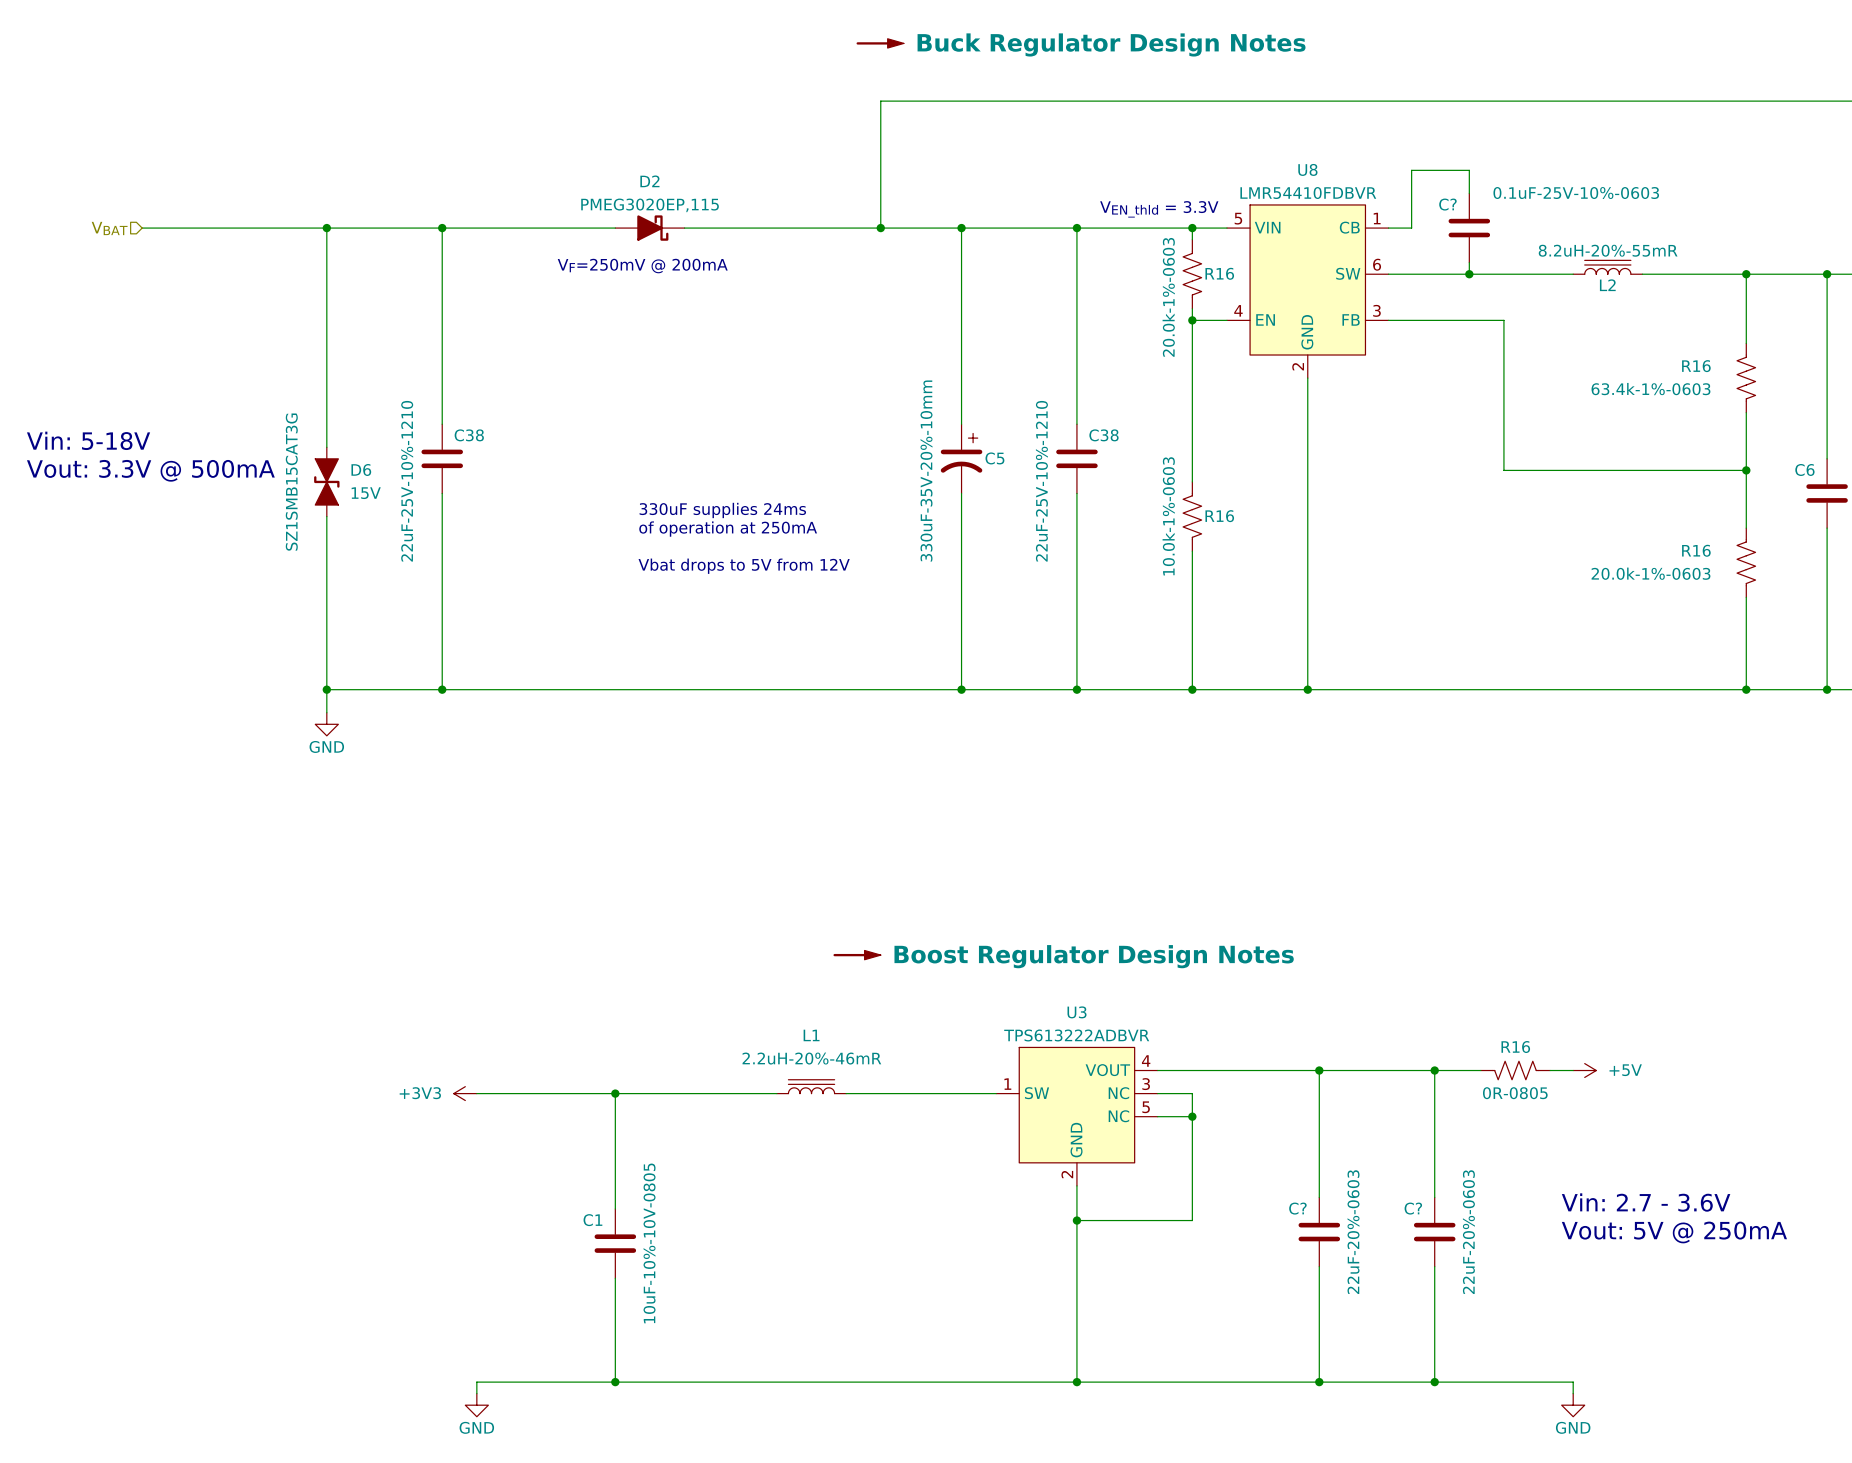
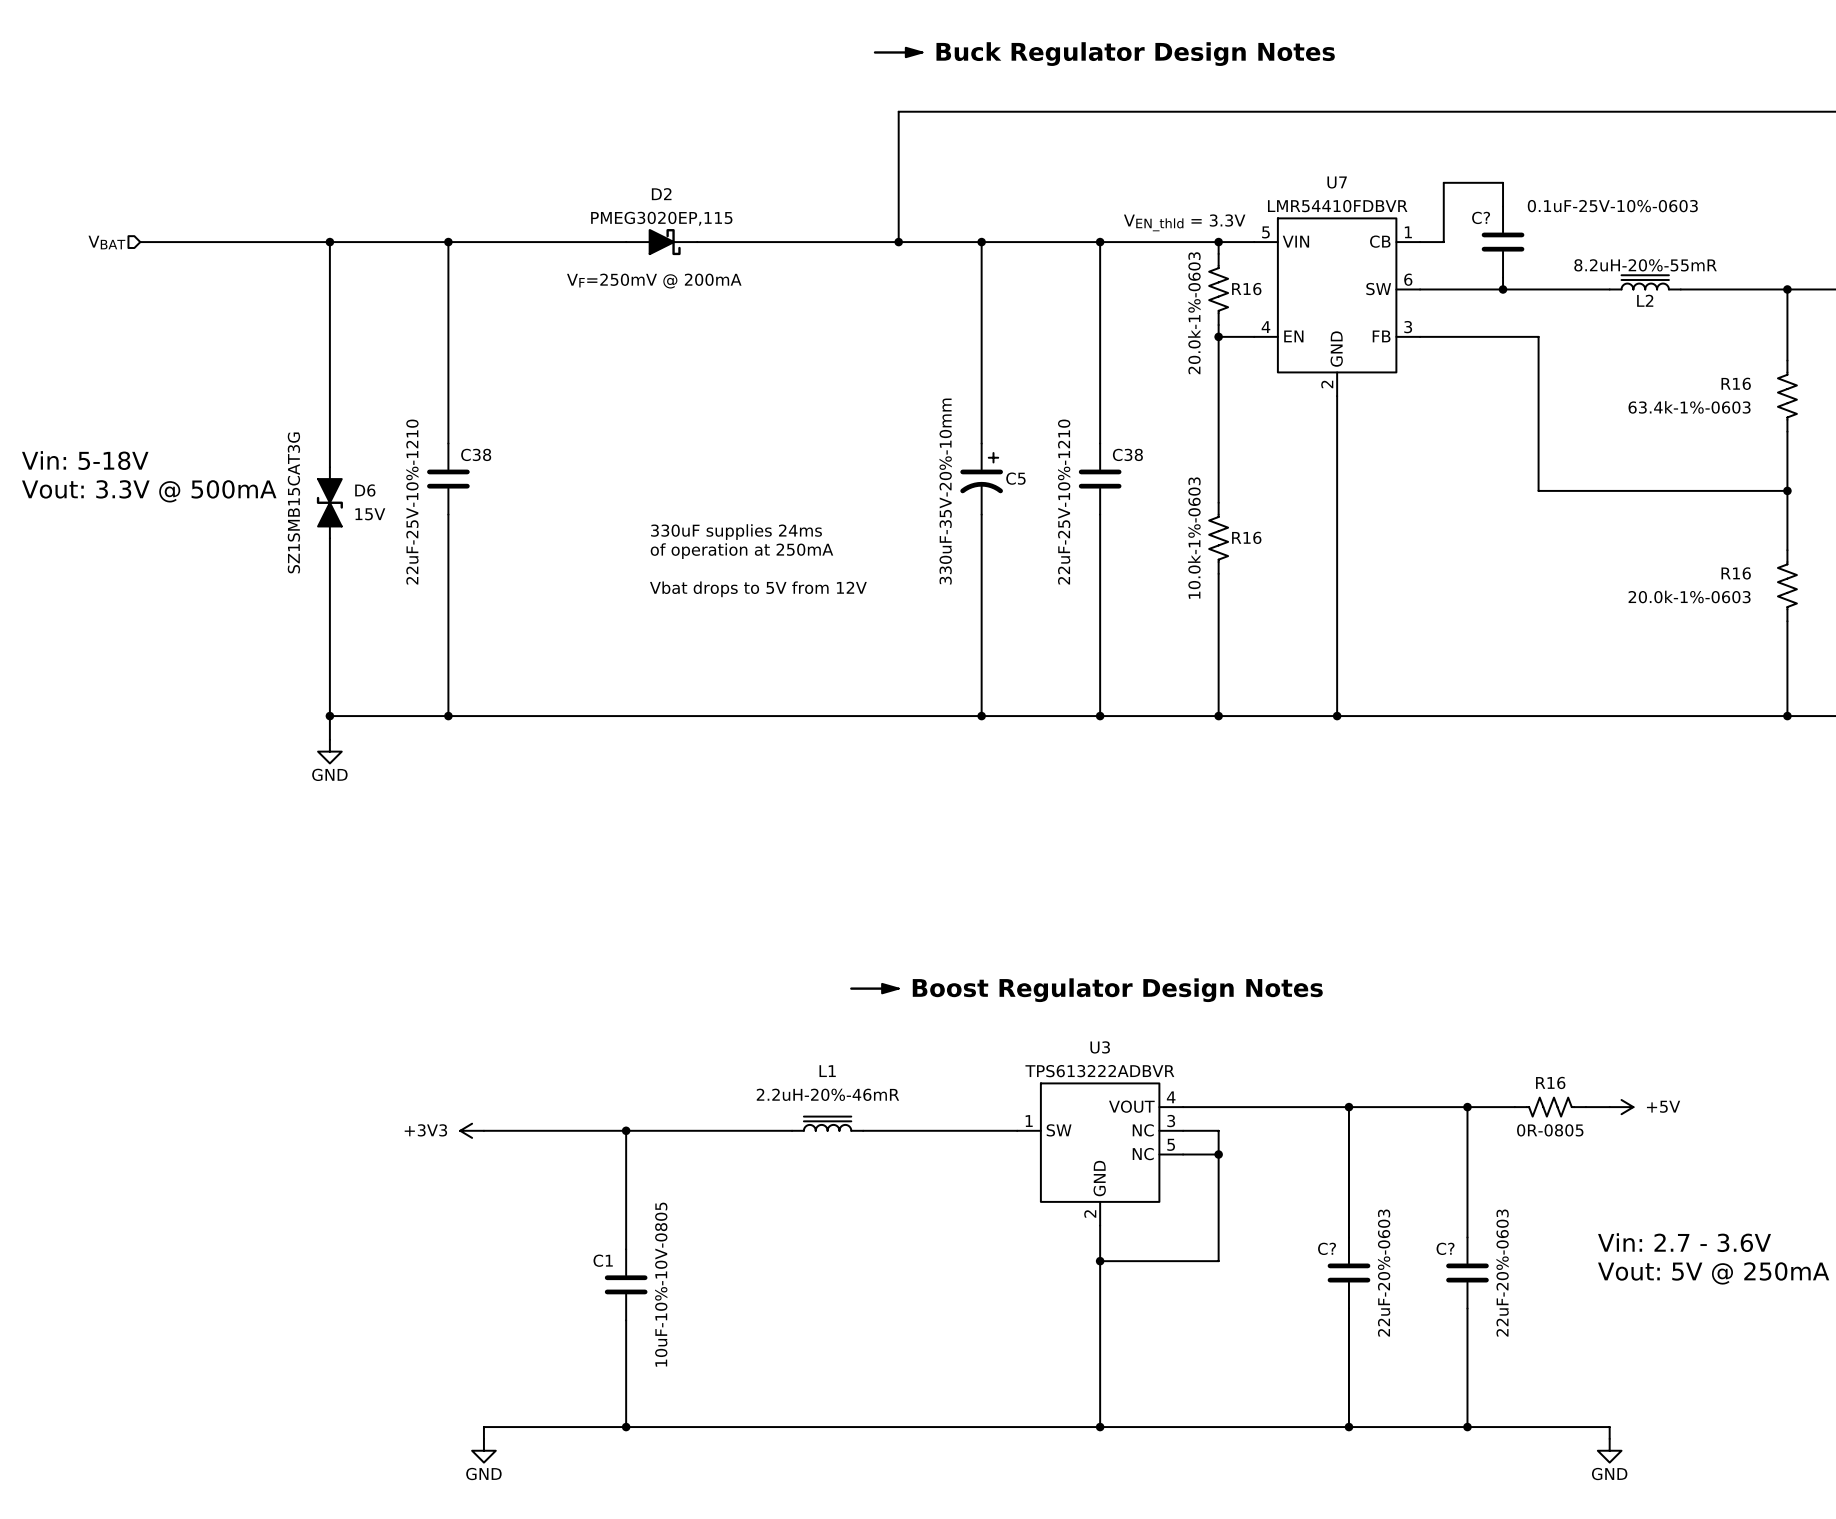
U8 name: U8 (1307, 169) -> U7 (1337, 182)

